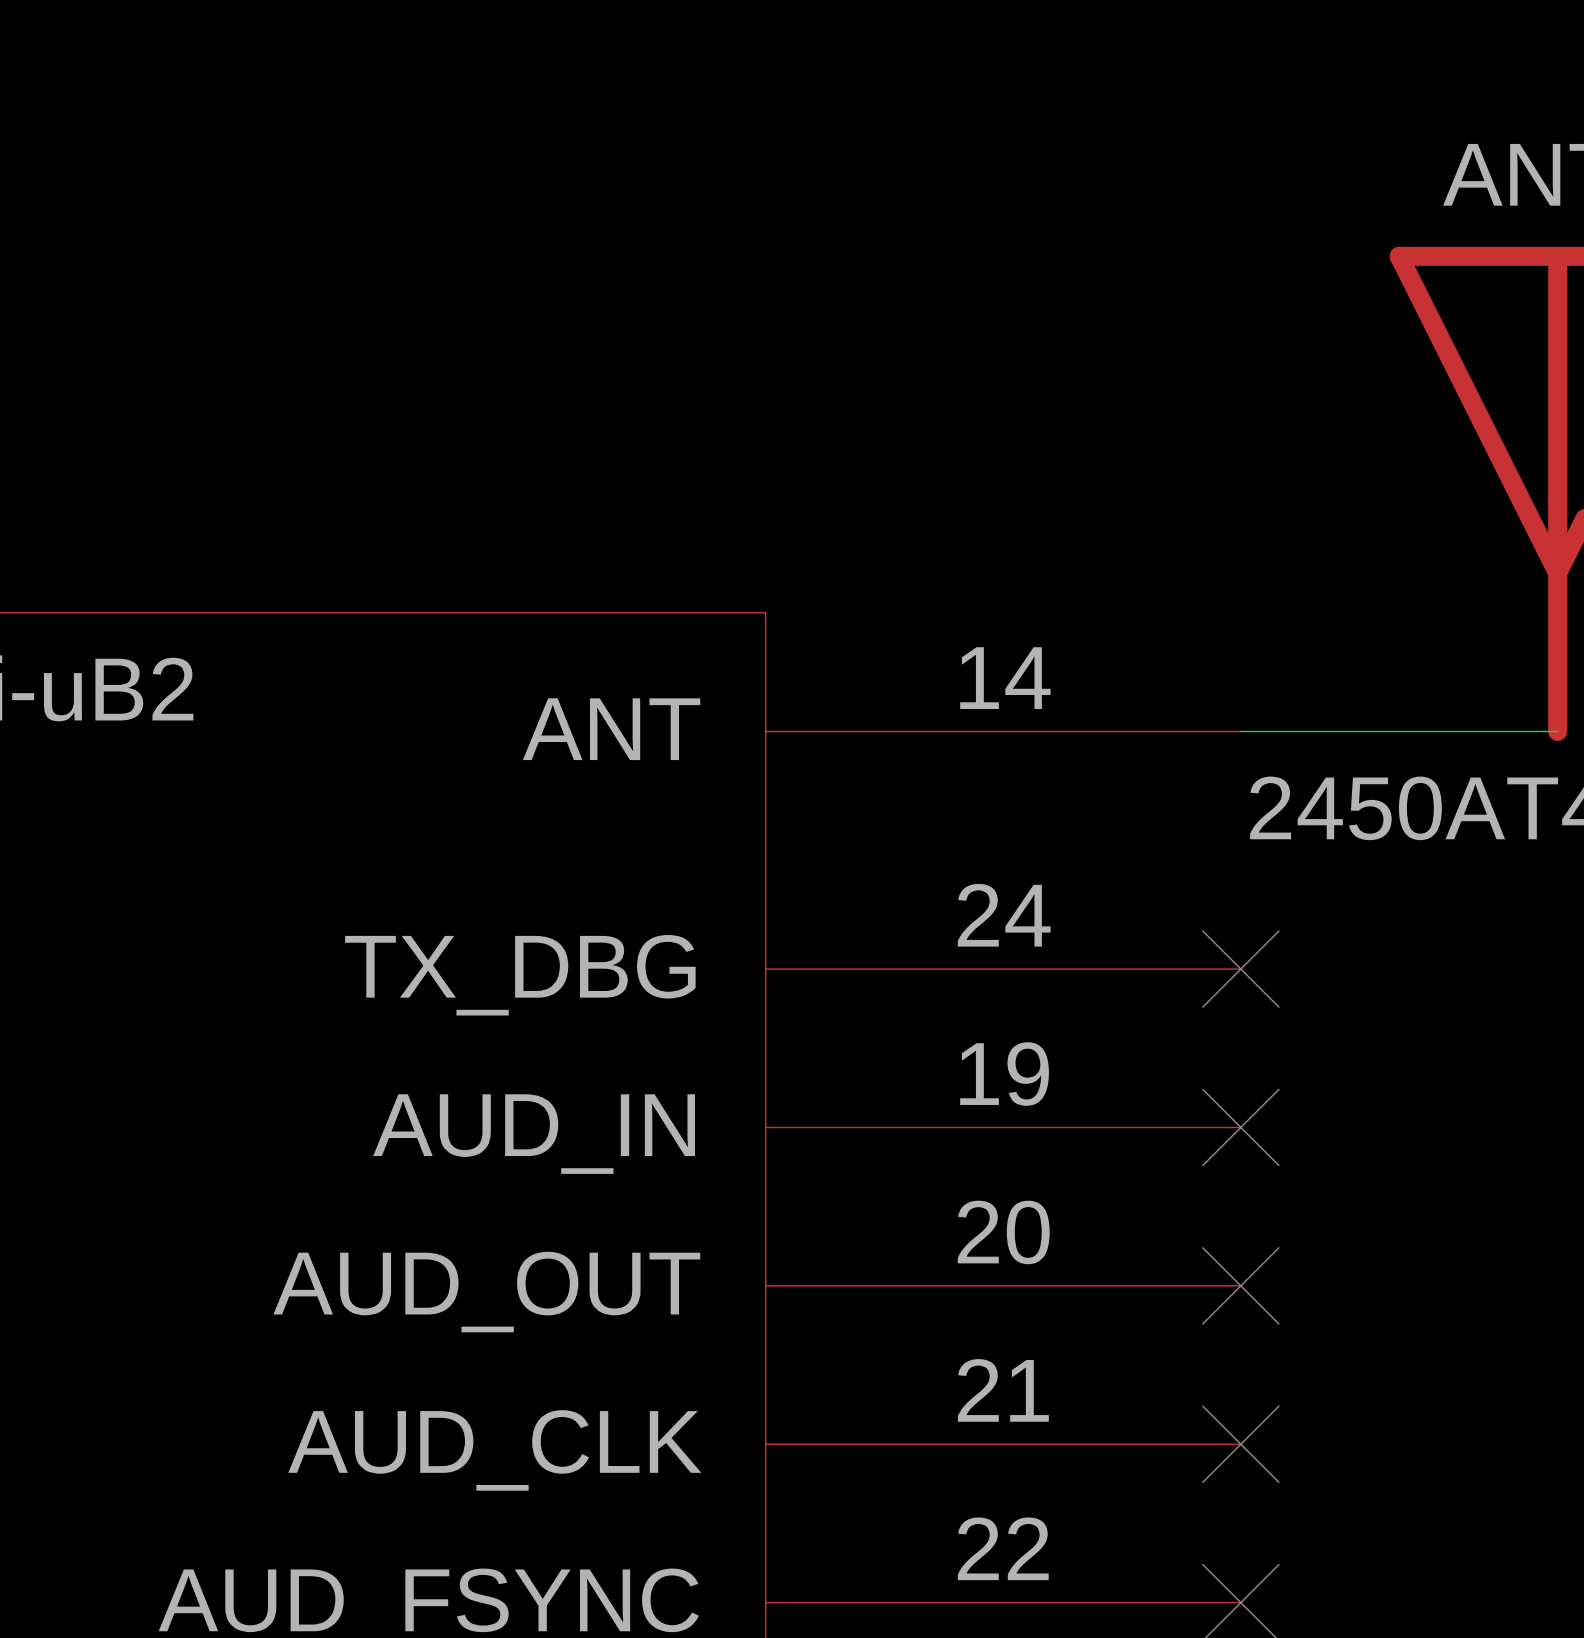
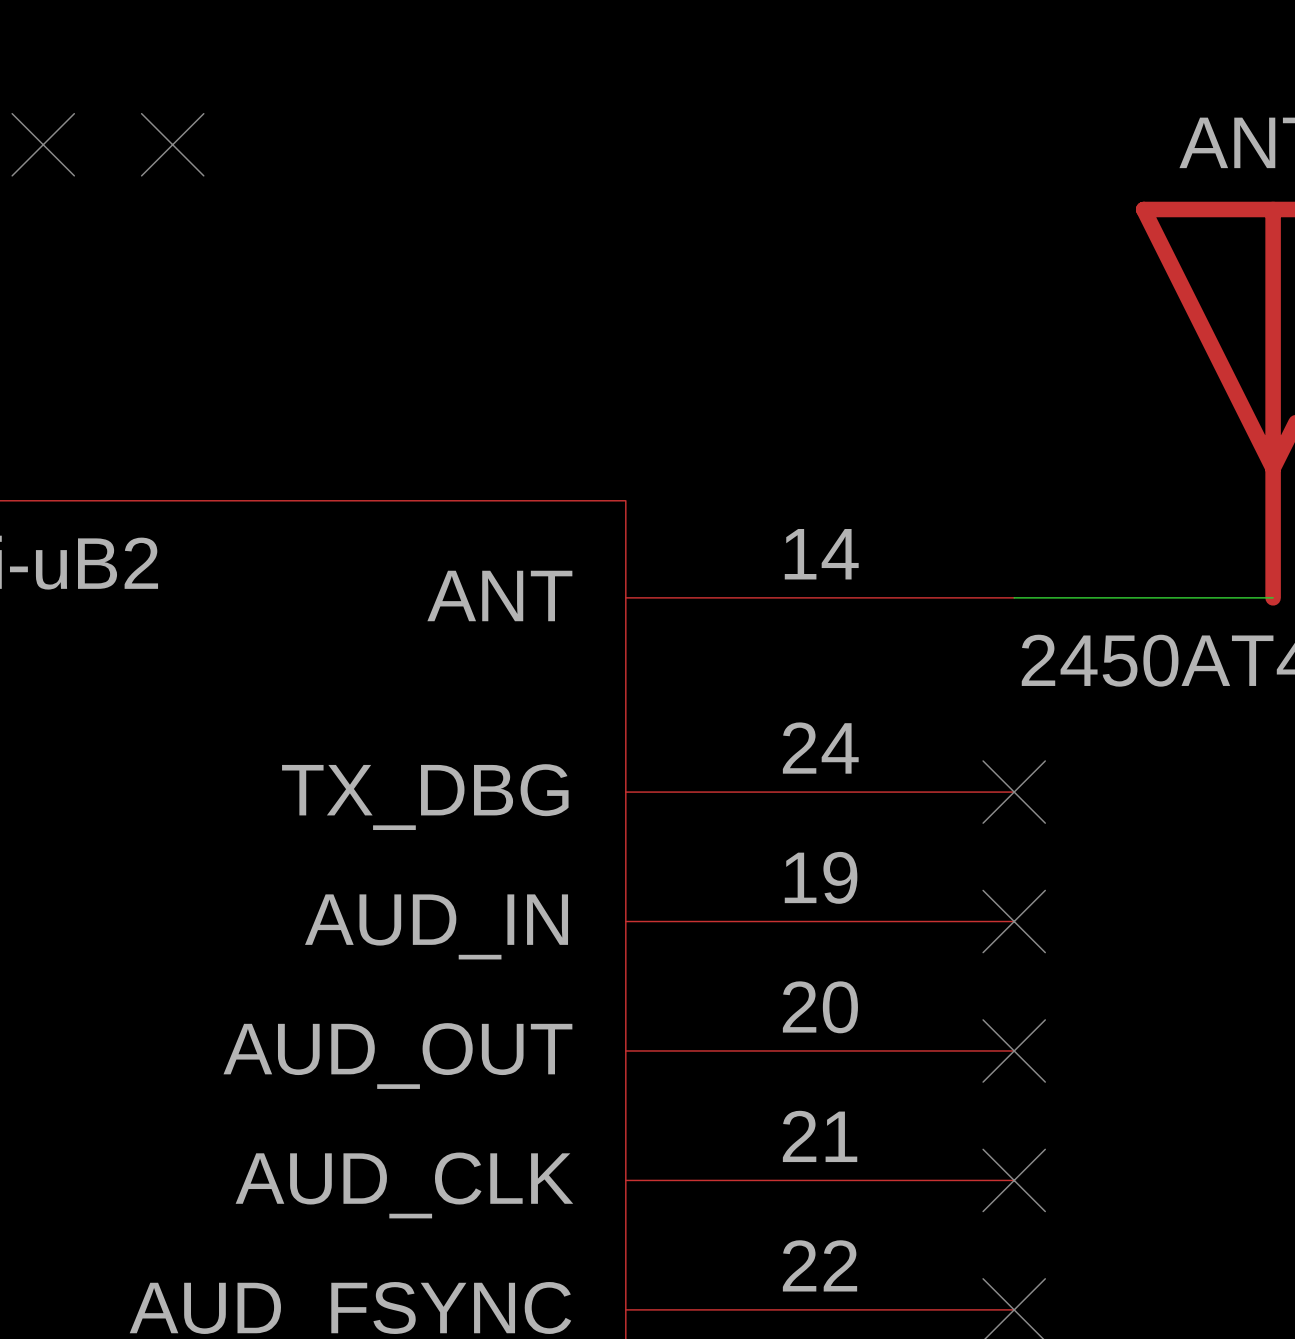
no-connect mark: none -> (43, 144)
no-connect mark: none -> (172, 144)

